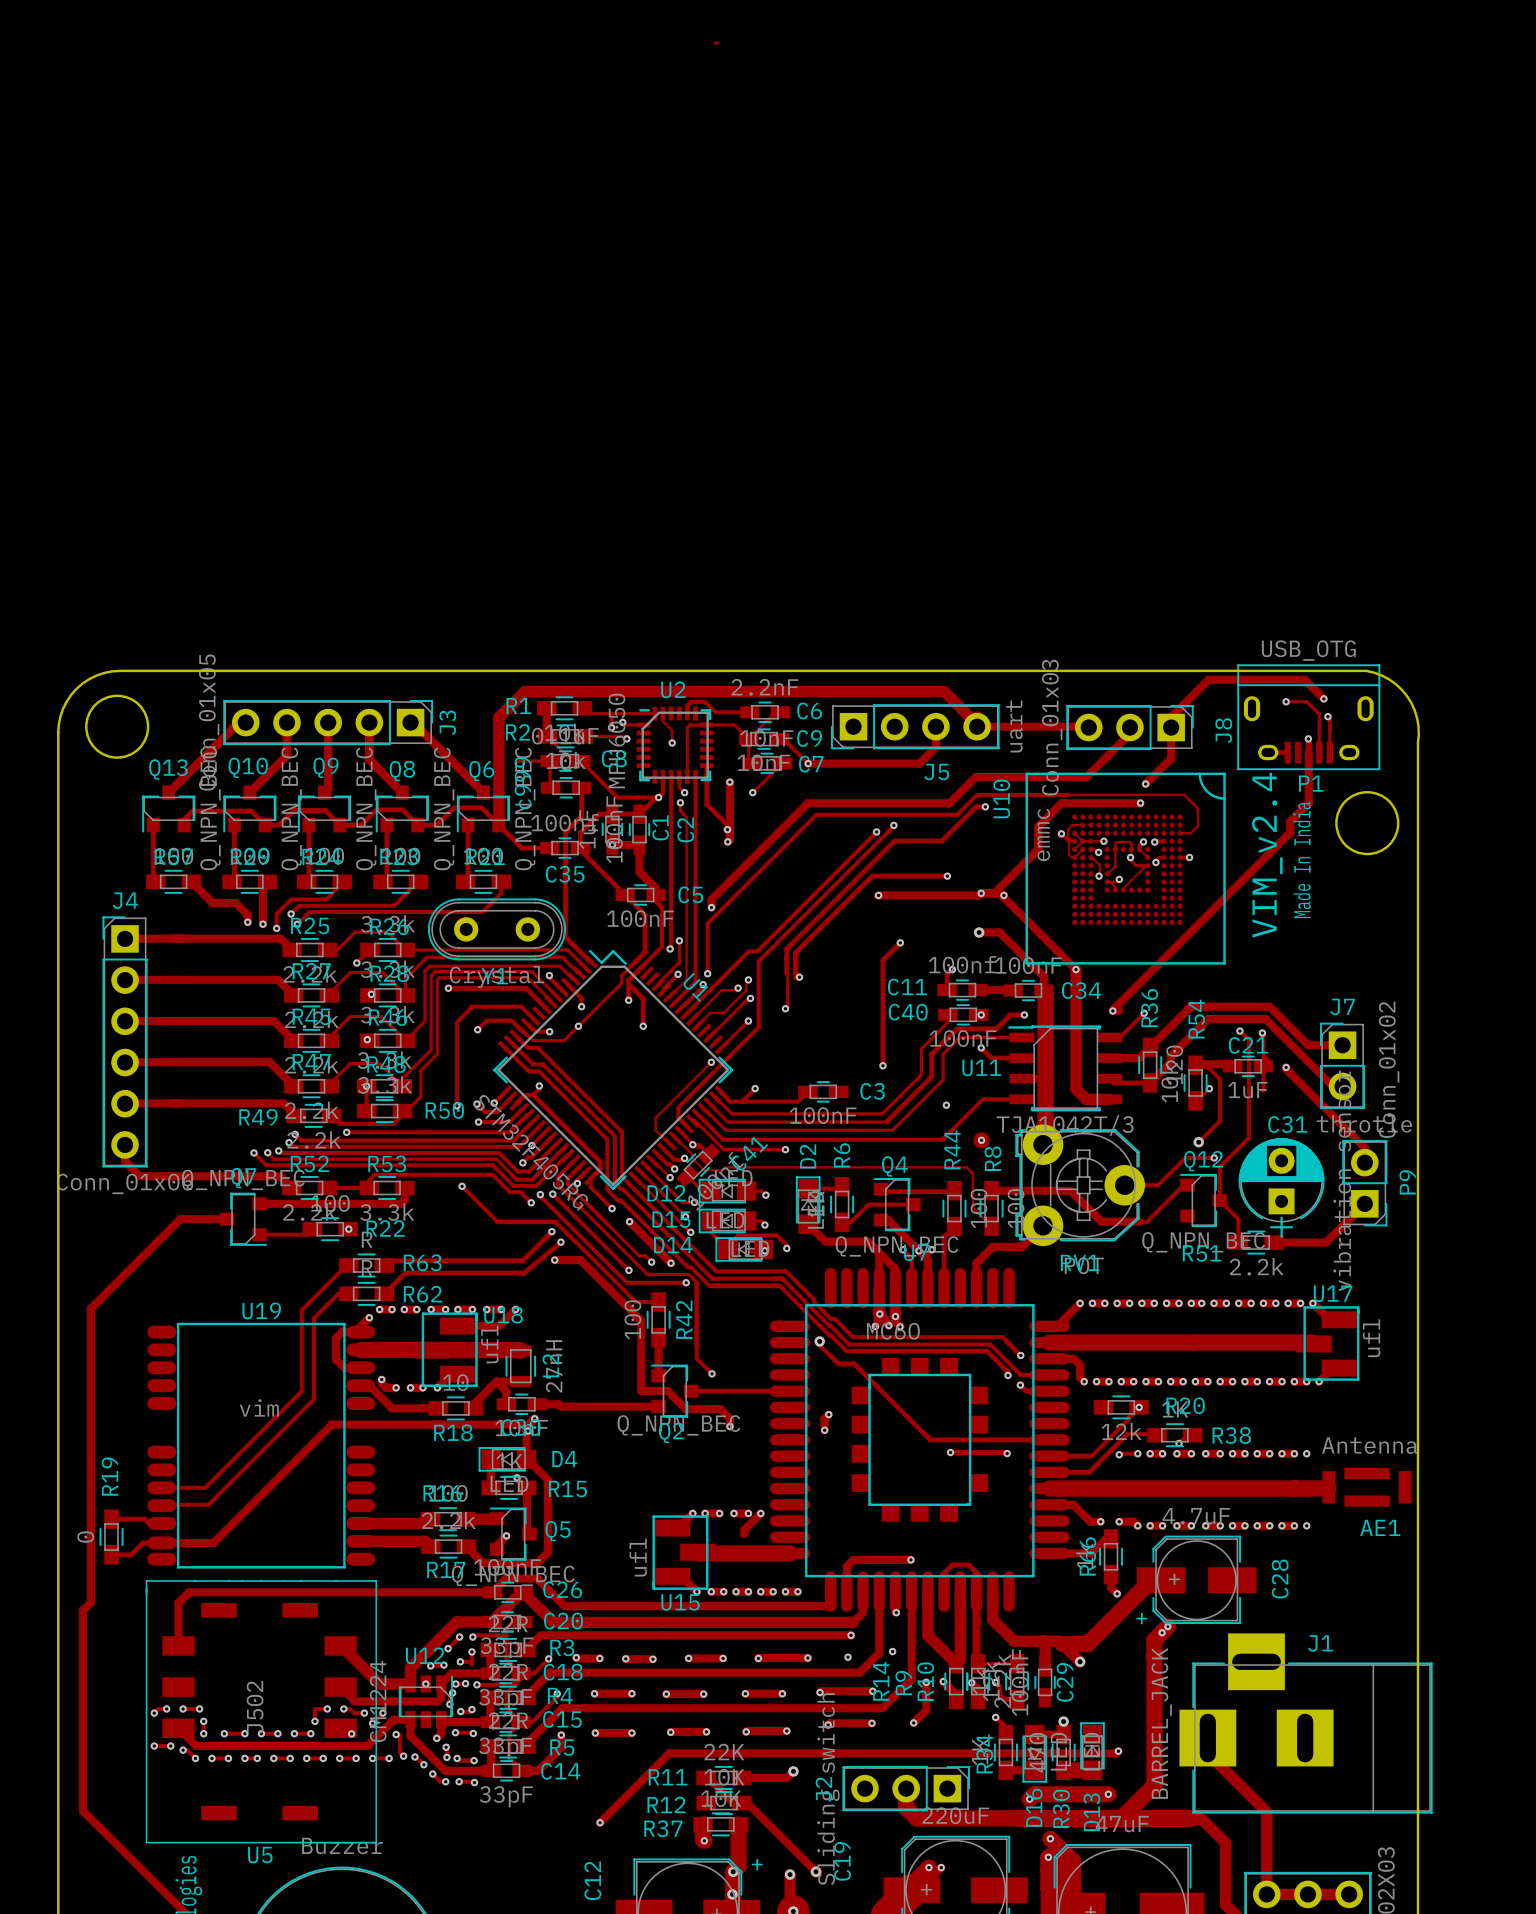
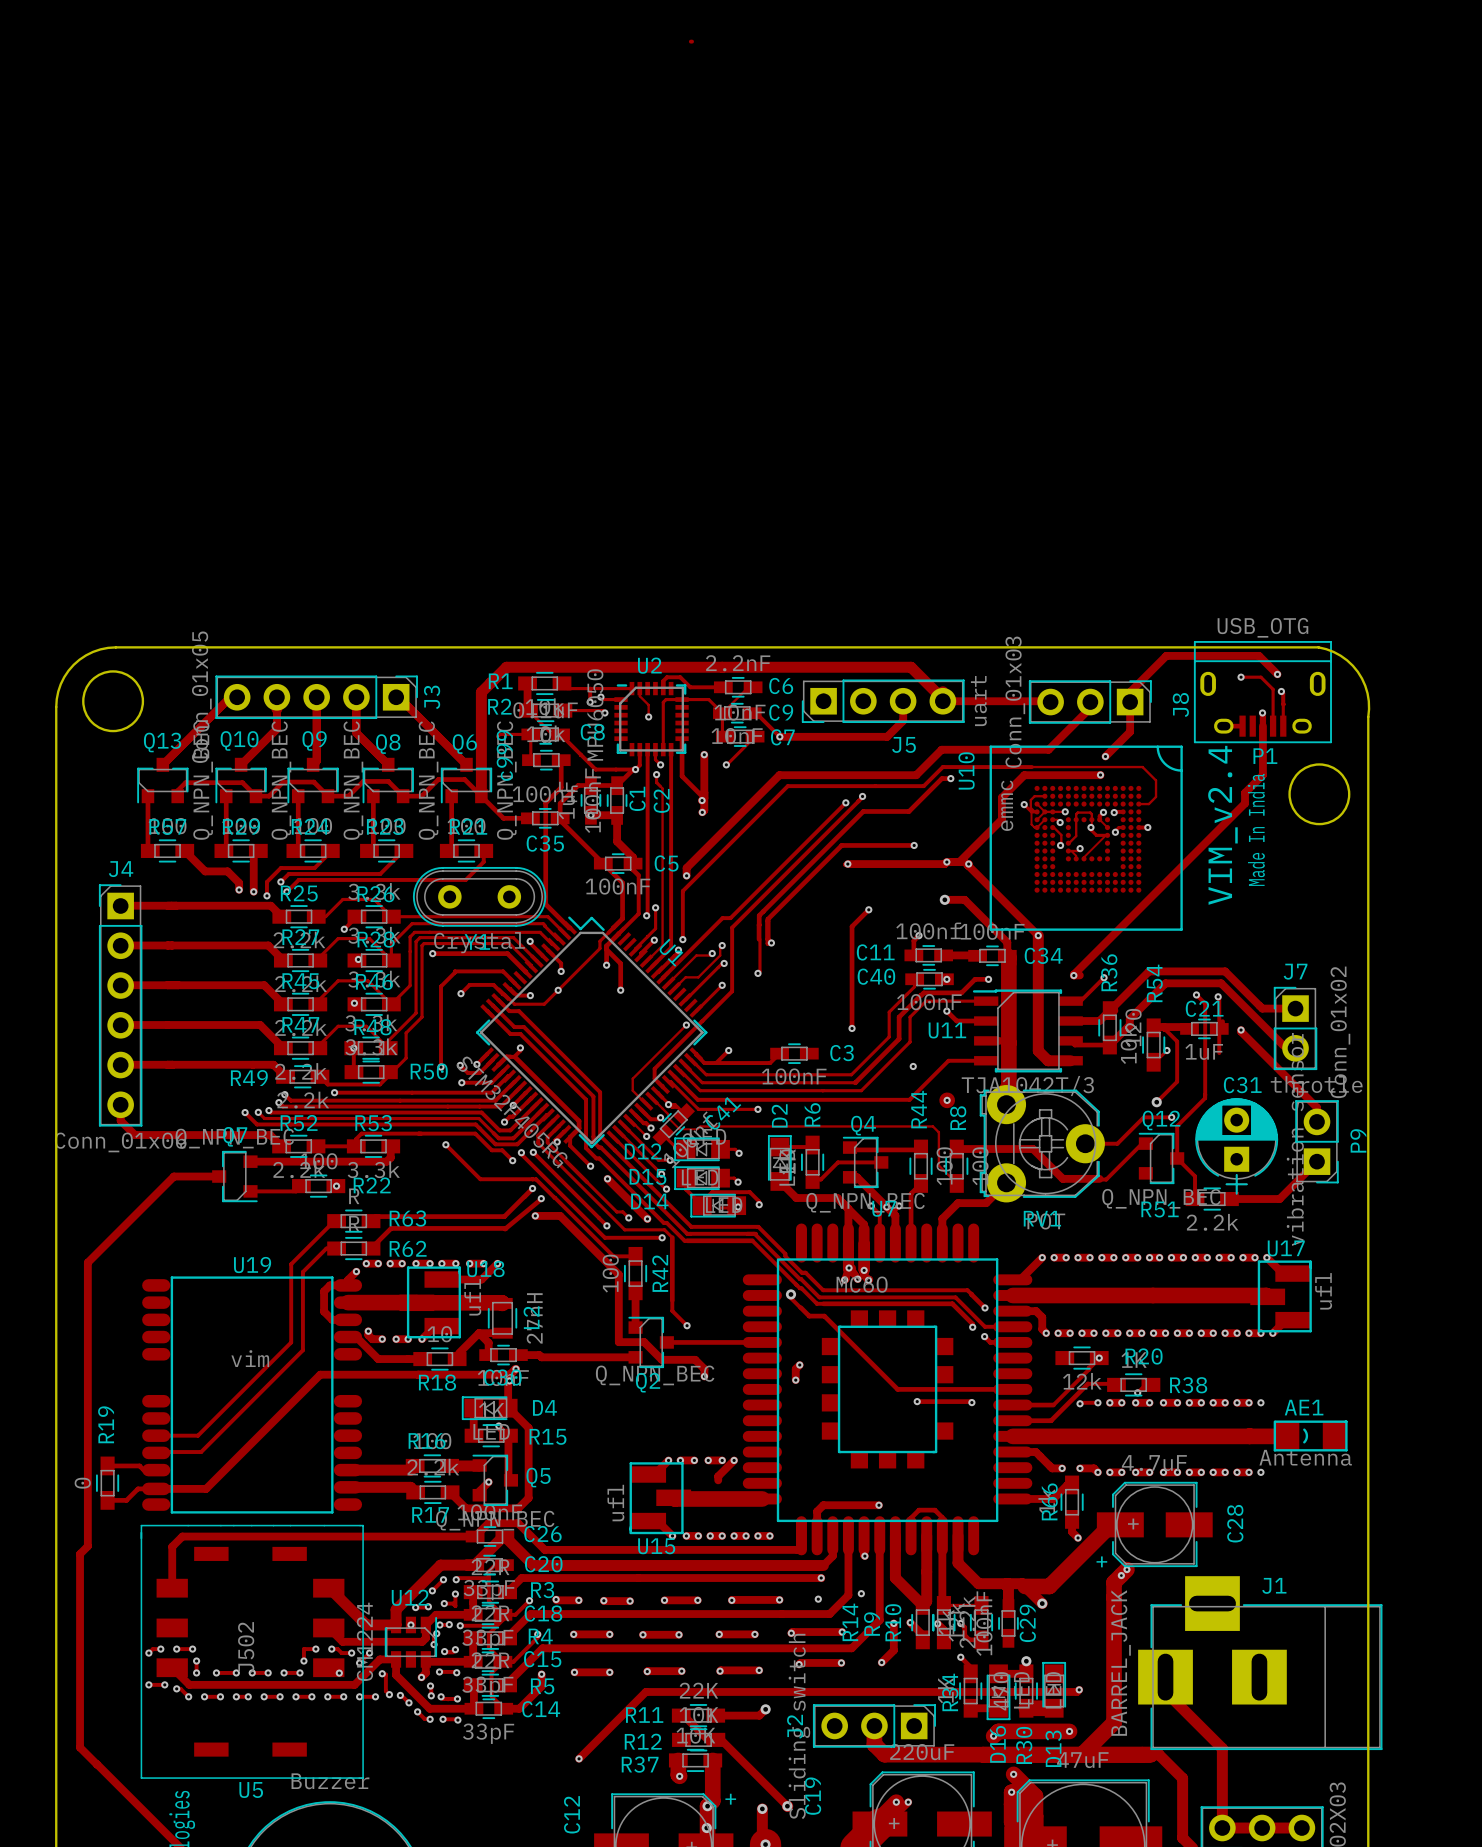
AE1 value position: Antenna (1369, 1445) -> Antenna (1305, 1457)
AE1 footprint: [1322, 1467, 1412, 1507] -> [1273, 1420, 1348, 1452]
AE1 name position: AE1 (1380, 1527) -> AE1 (1304, 1407)

